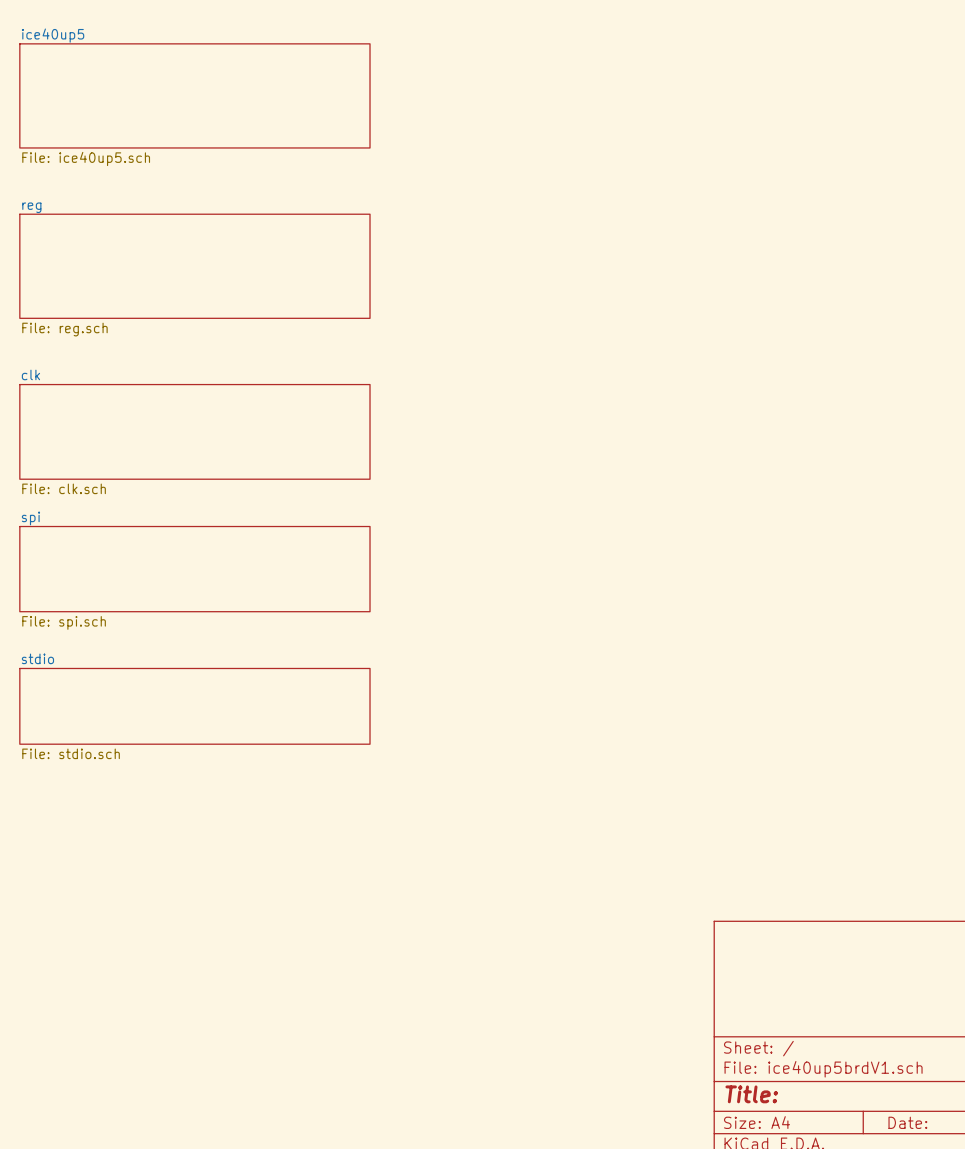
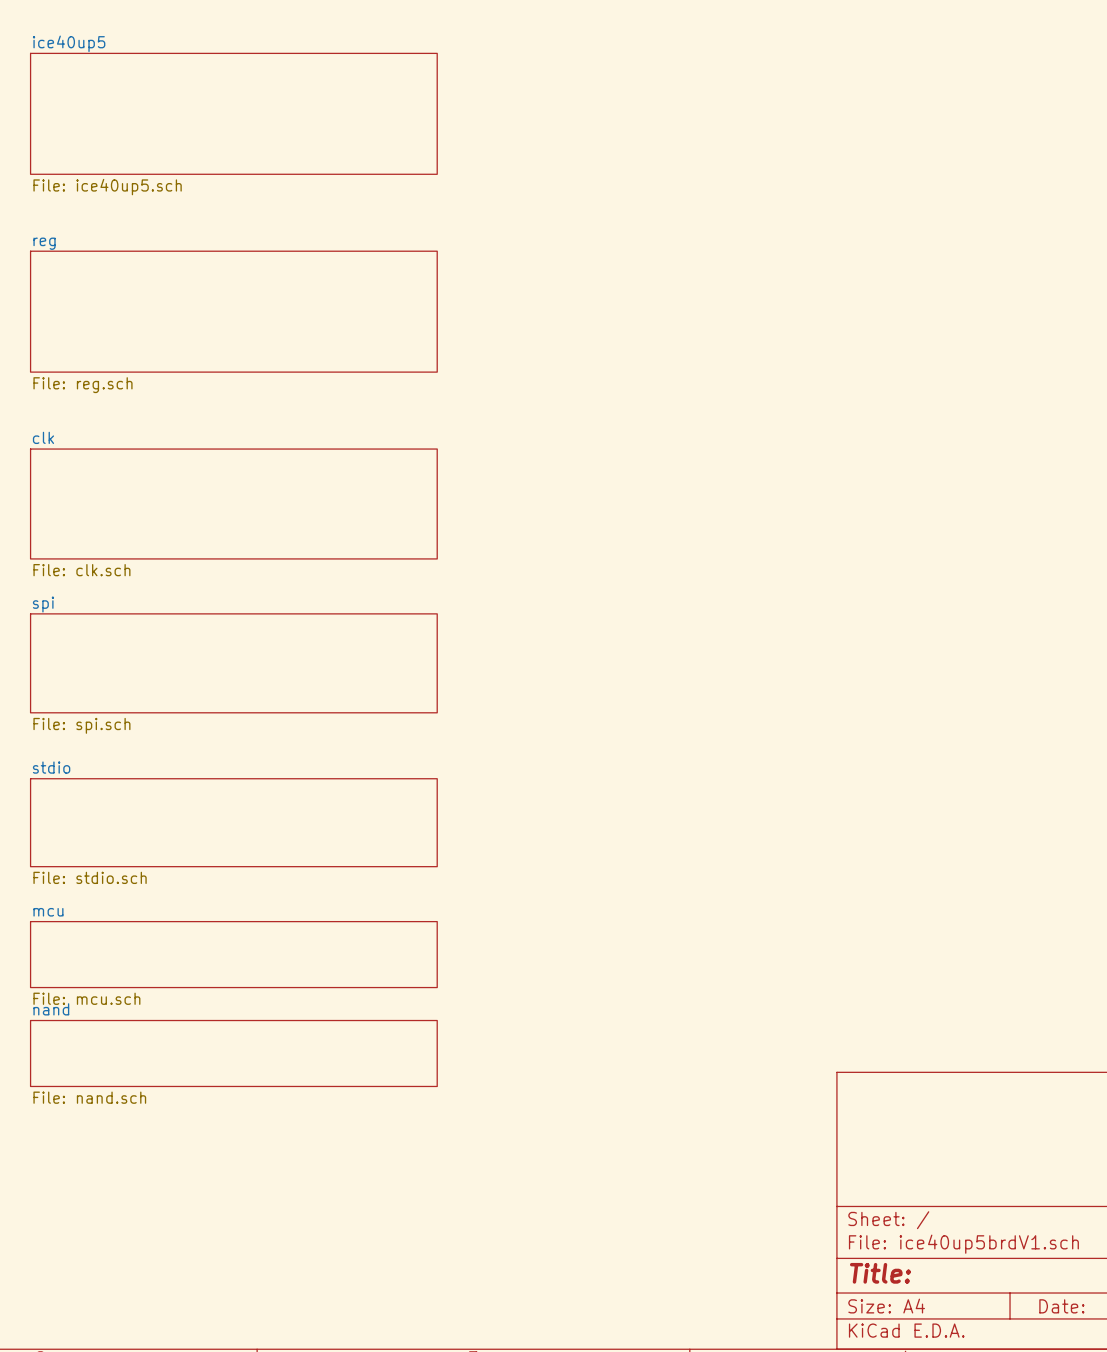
sheet mcu: none -> File: mcu.sch (233, 954)
sheet nand: none -> File: nand.sch (233, 1053)

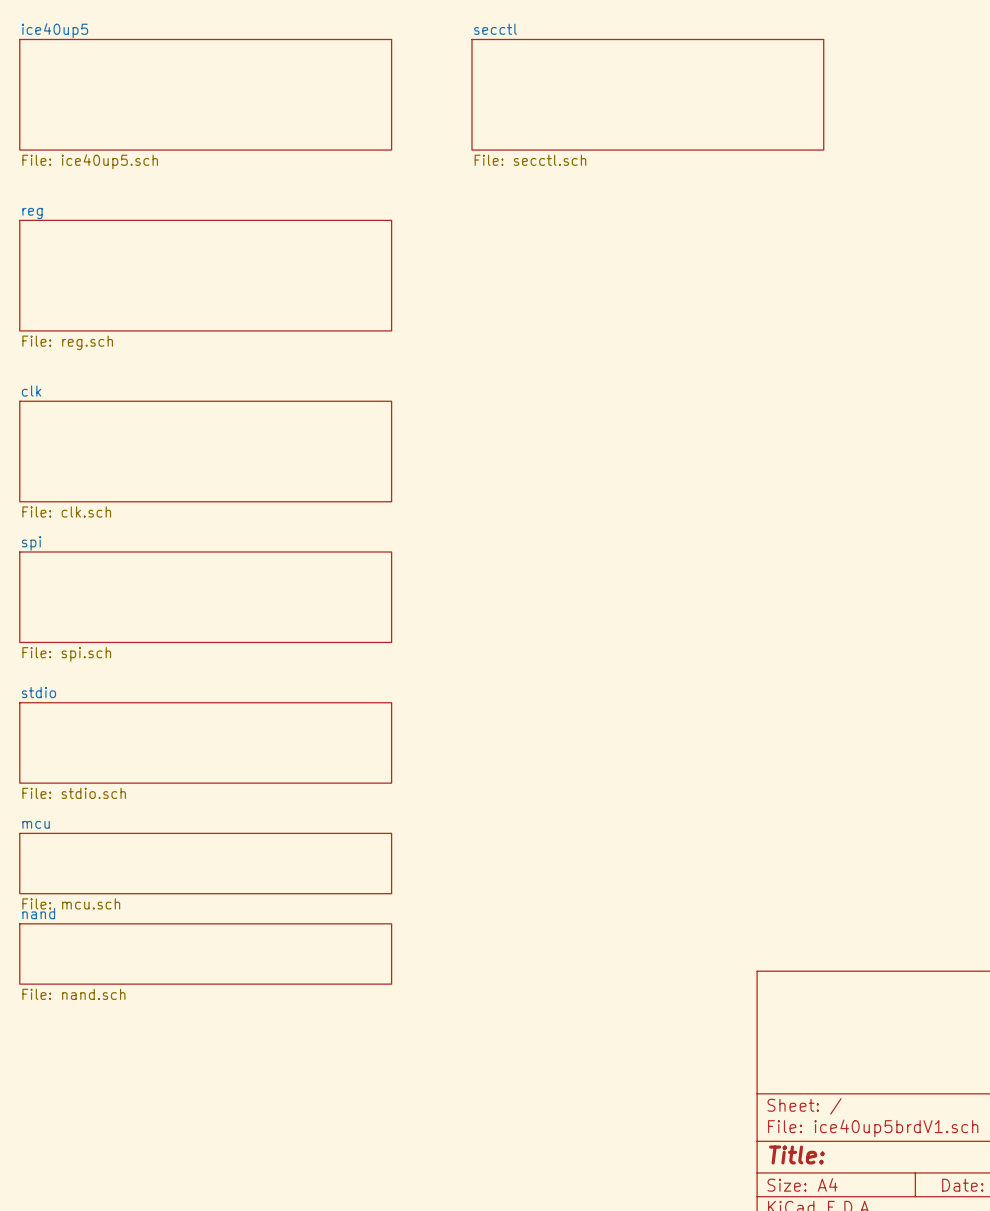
sheet secctl: none -> File: secctl.sch (647, 94)

